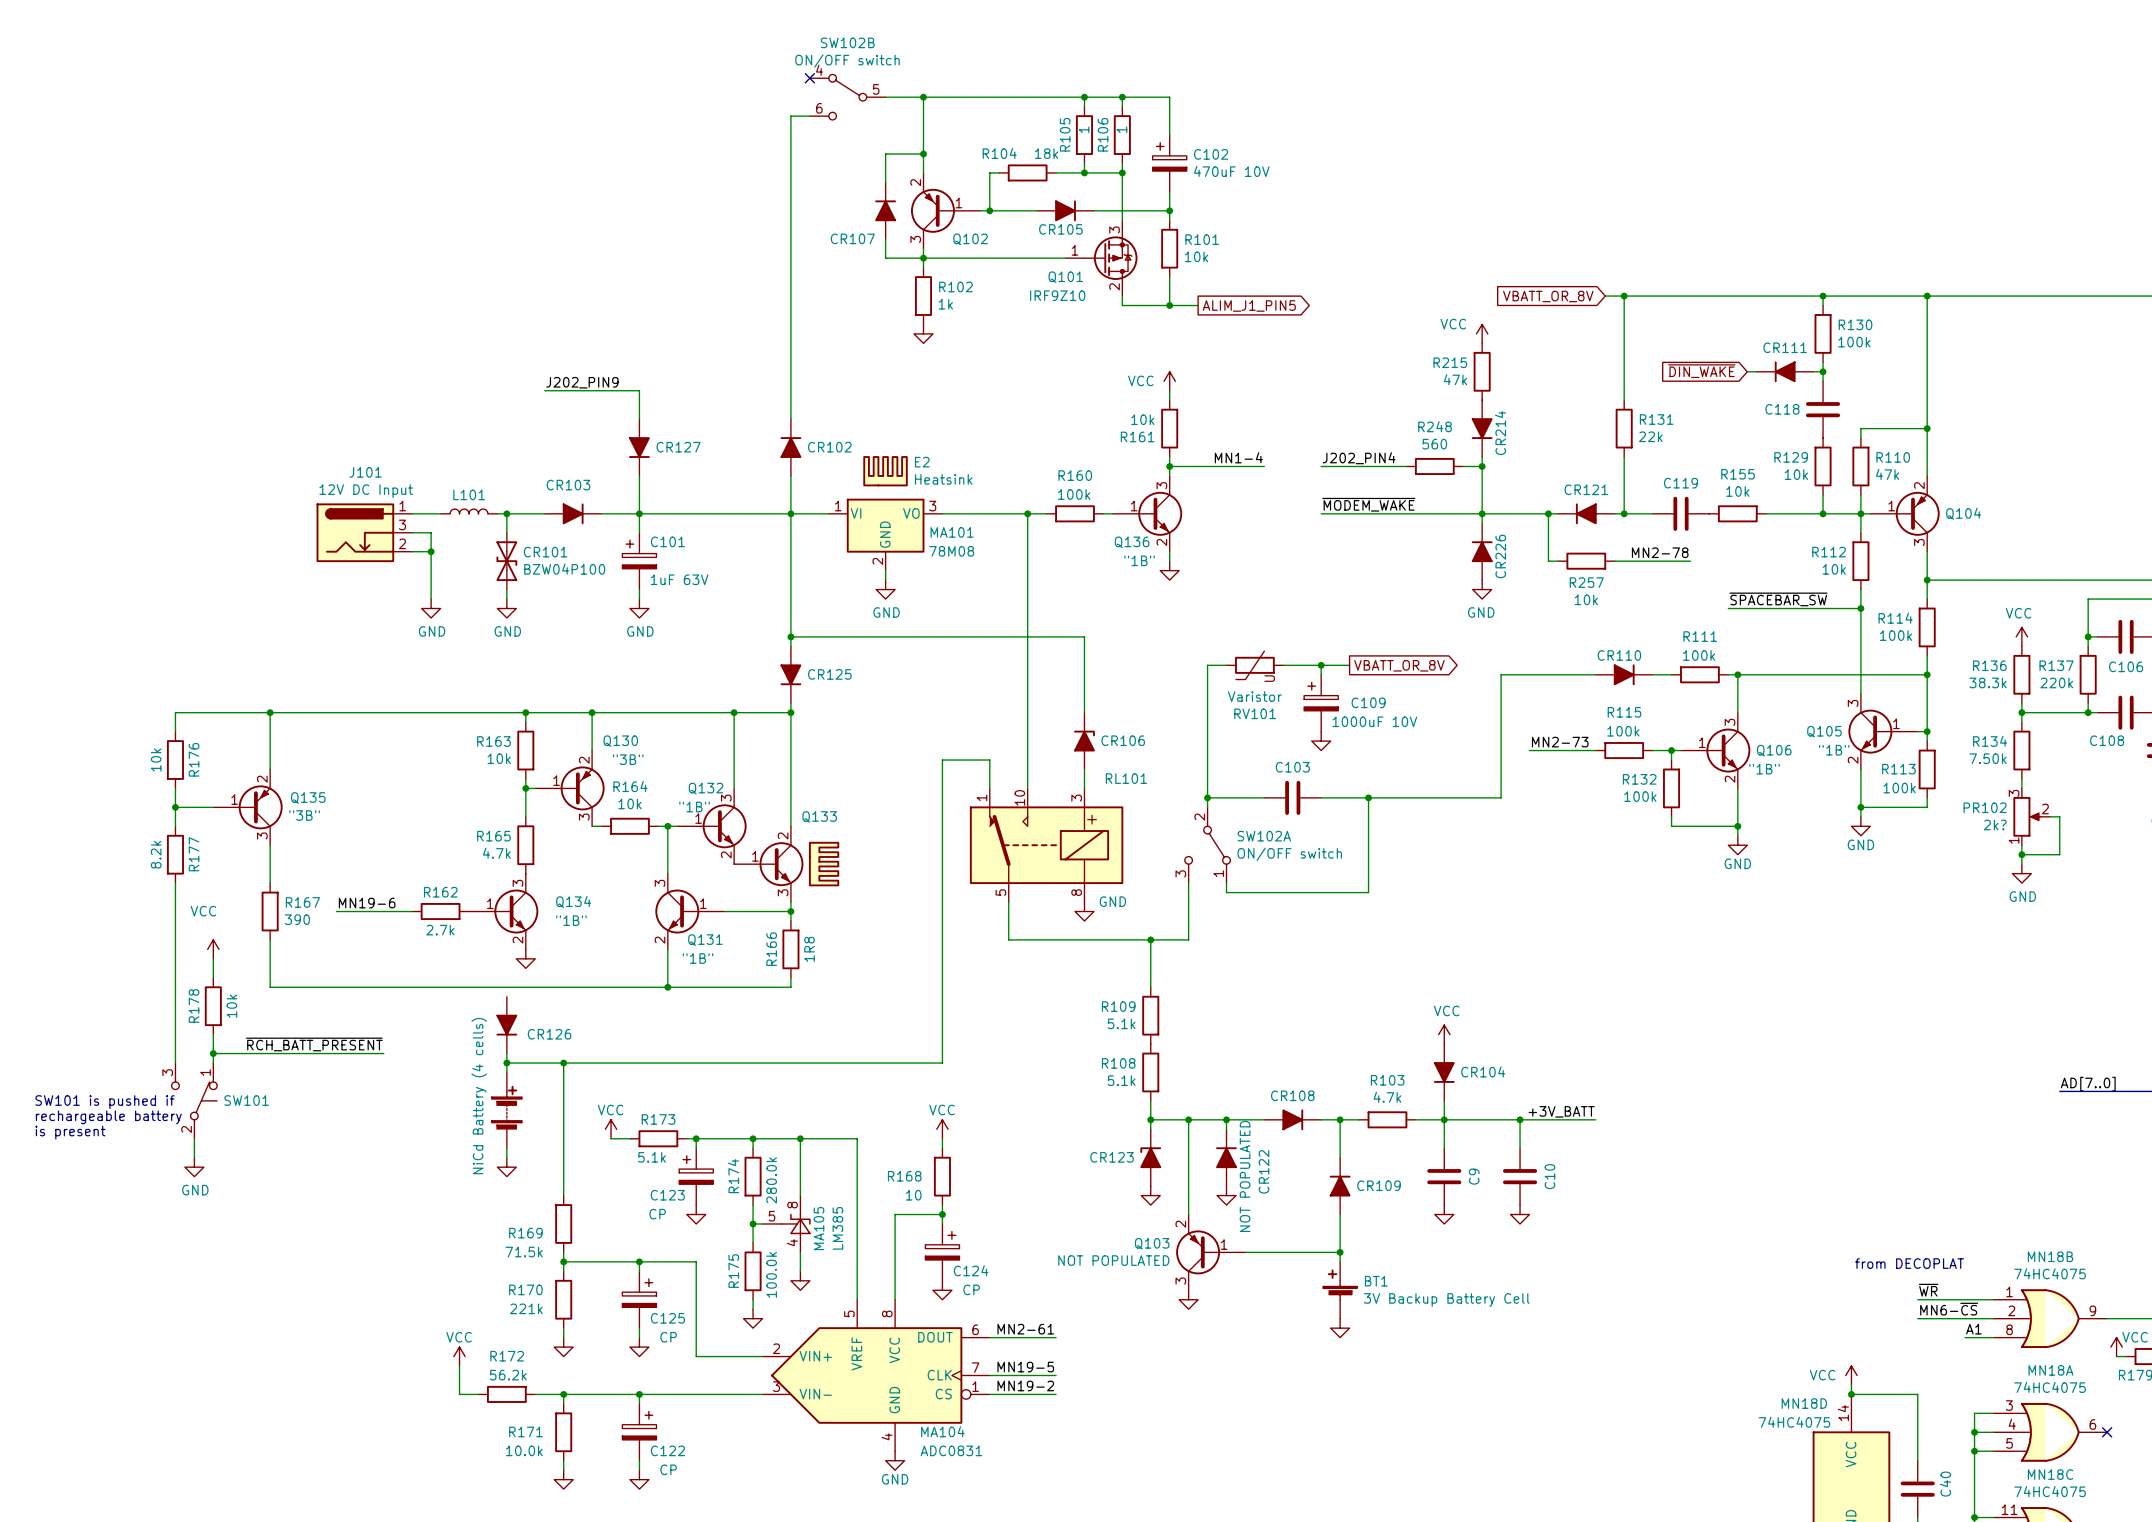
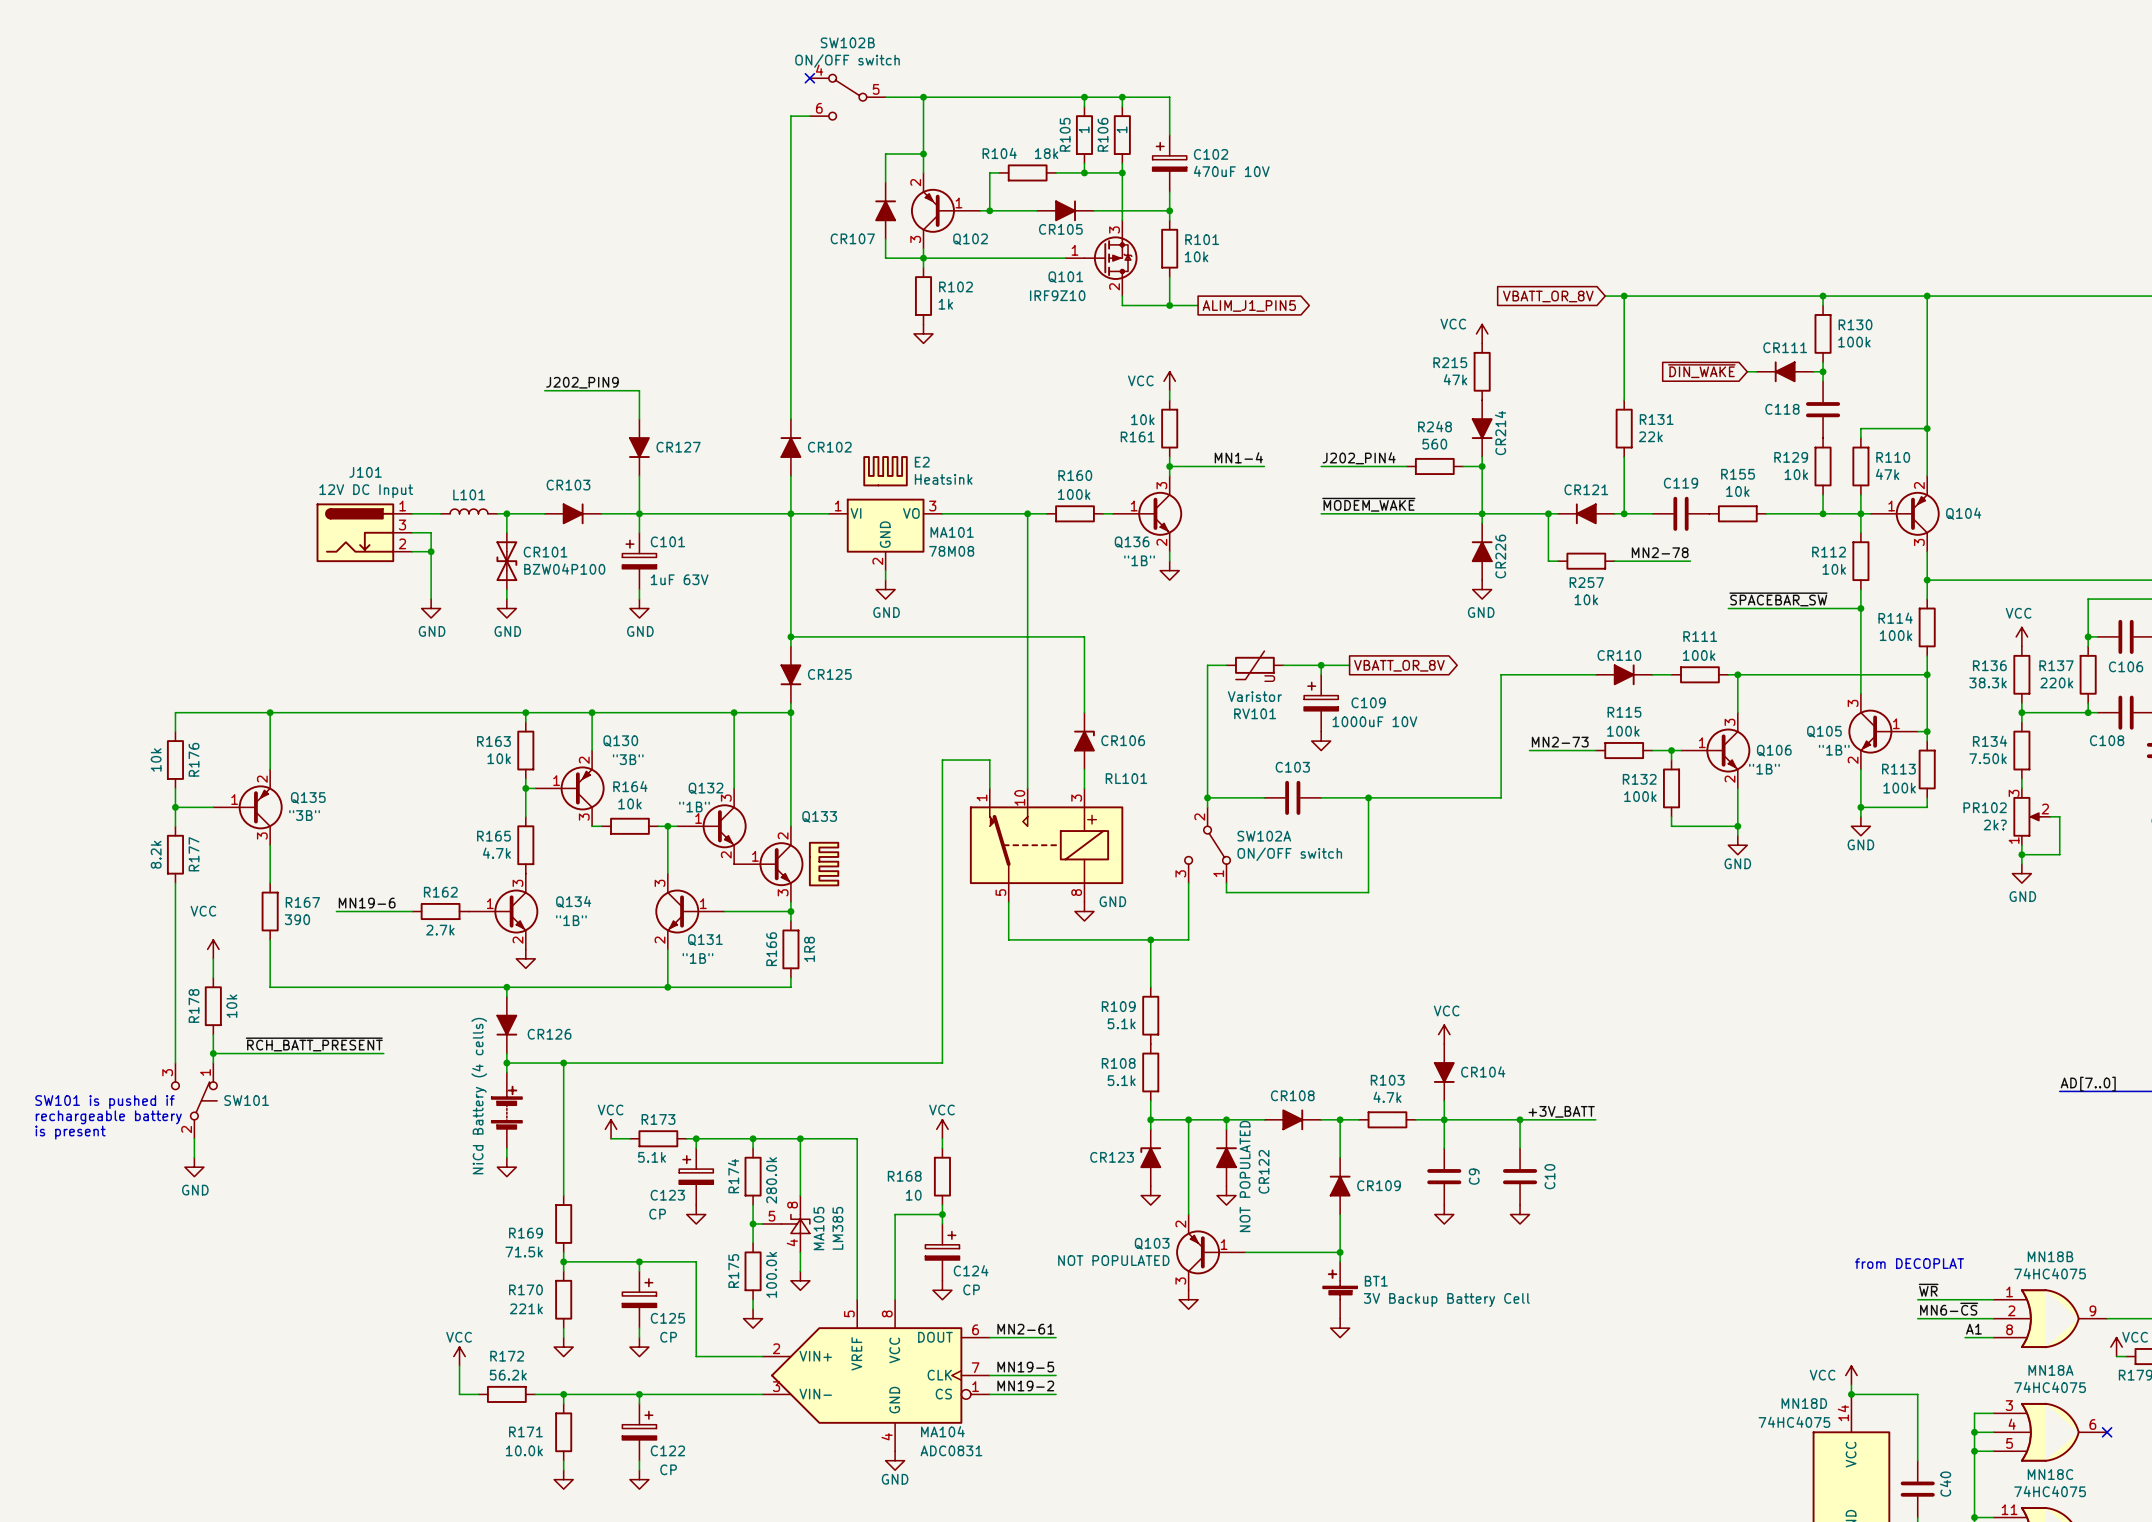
wire: none -> (506, 987) (506, 996)
junction: none -> (506, 987)

